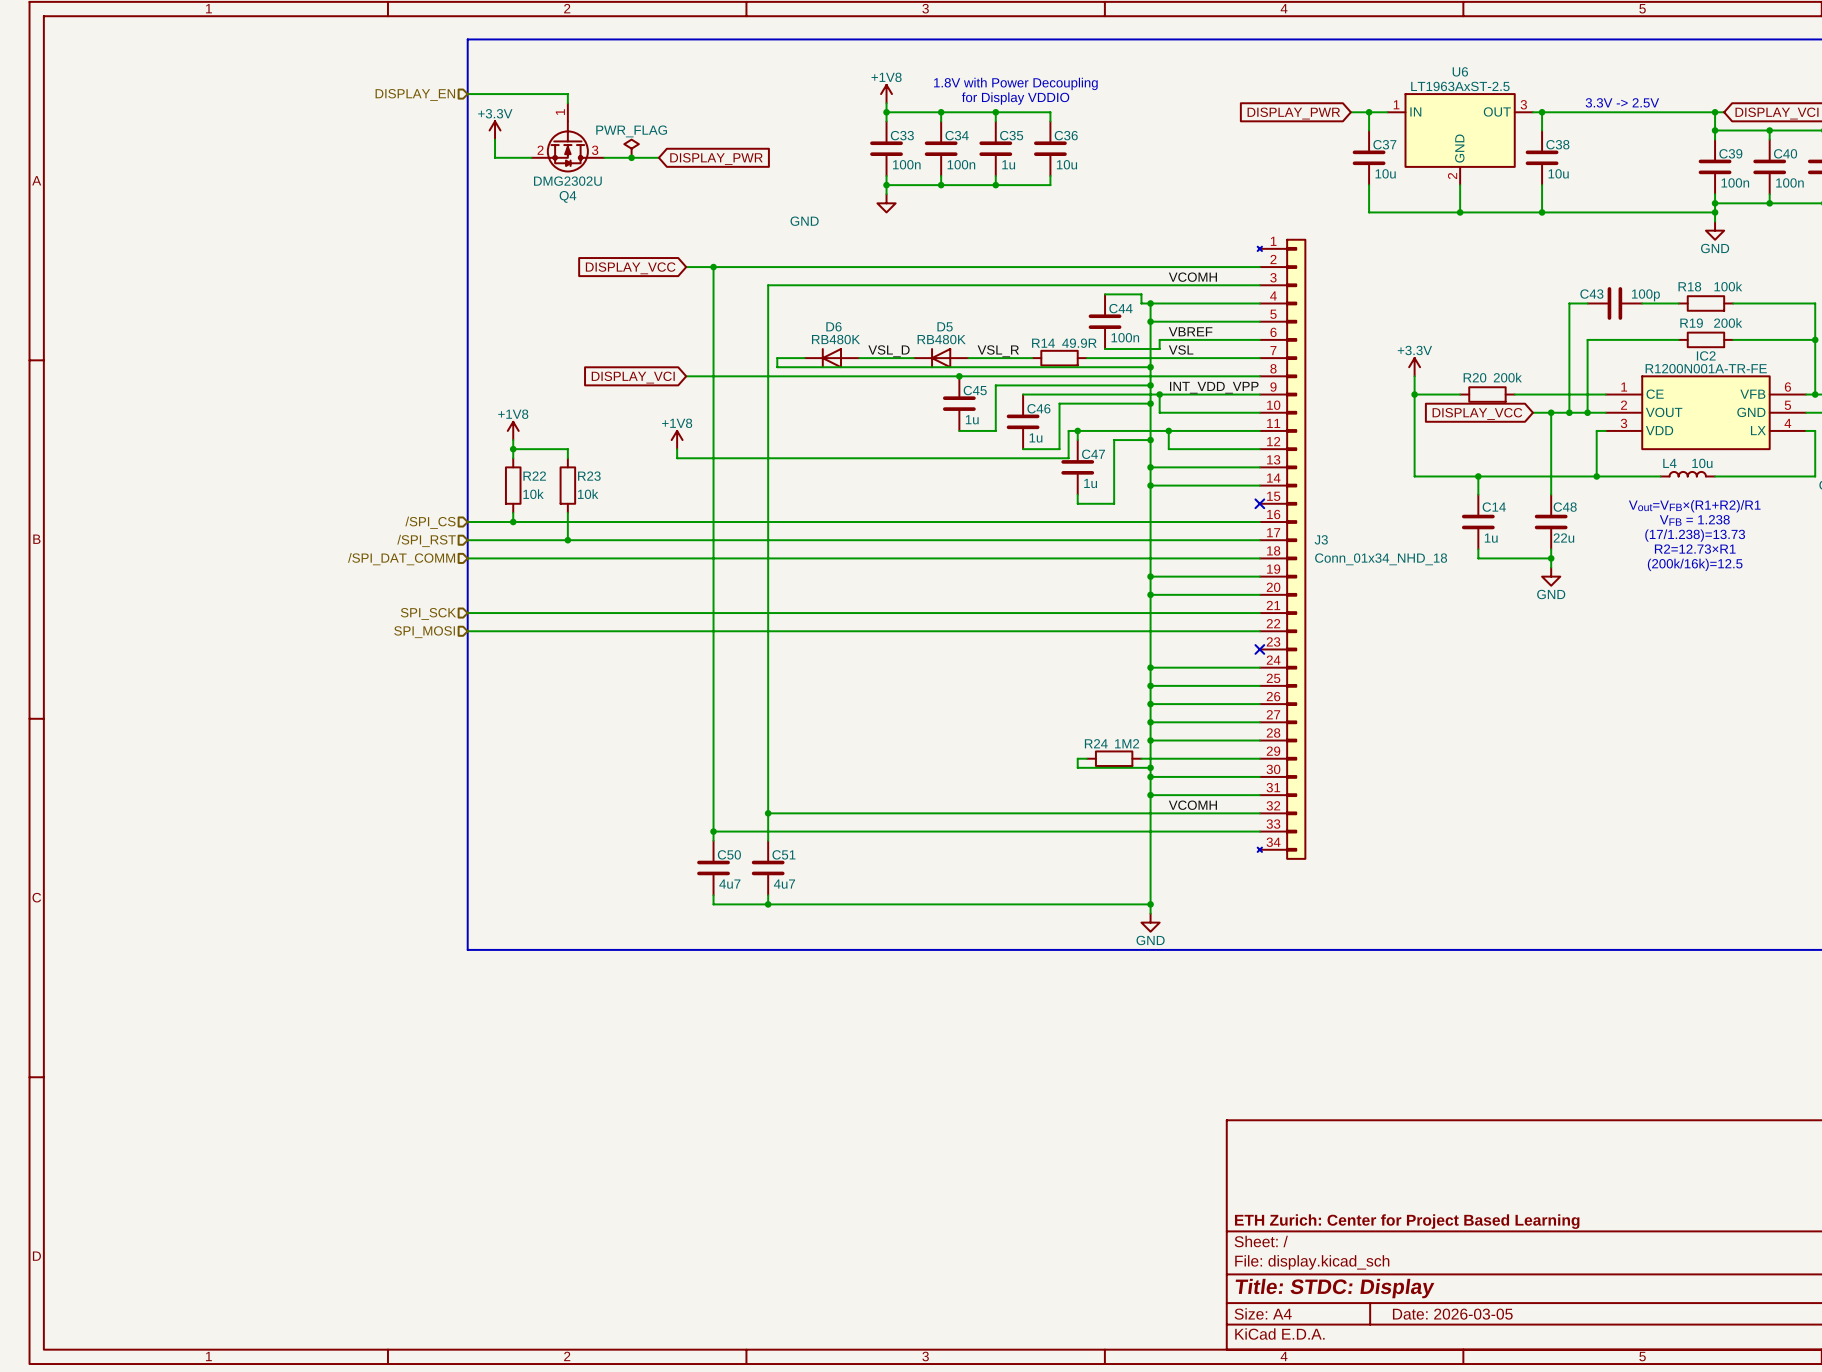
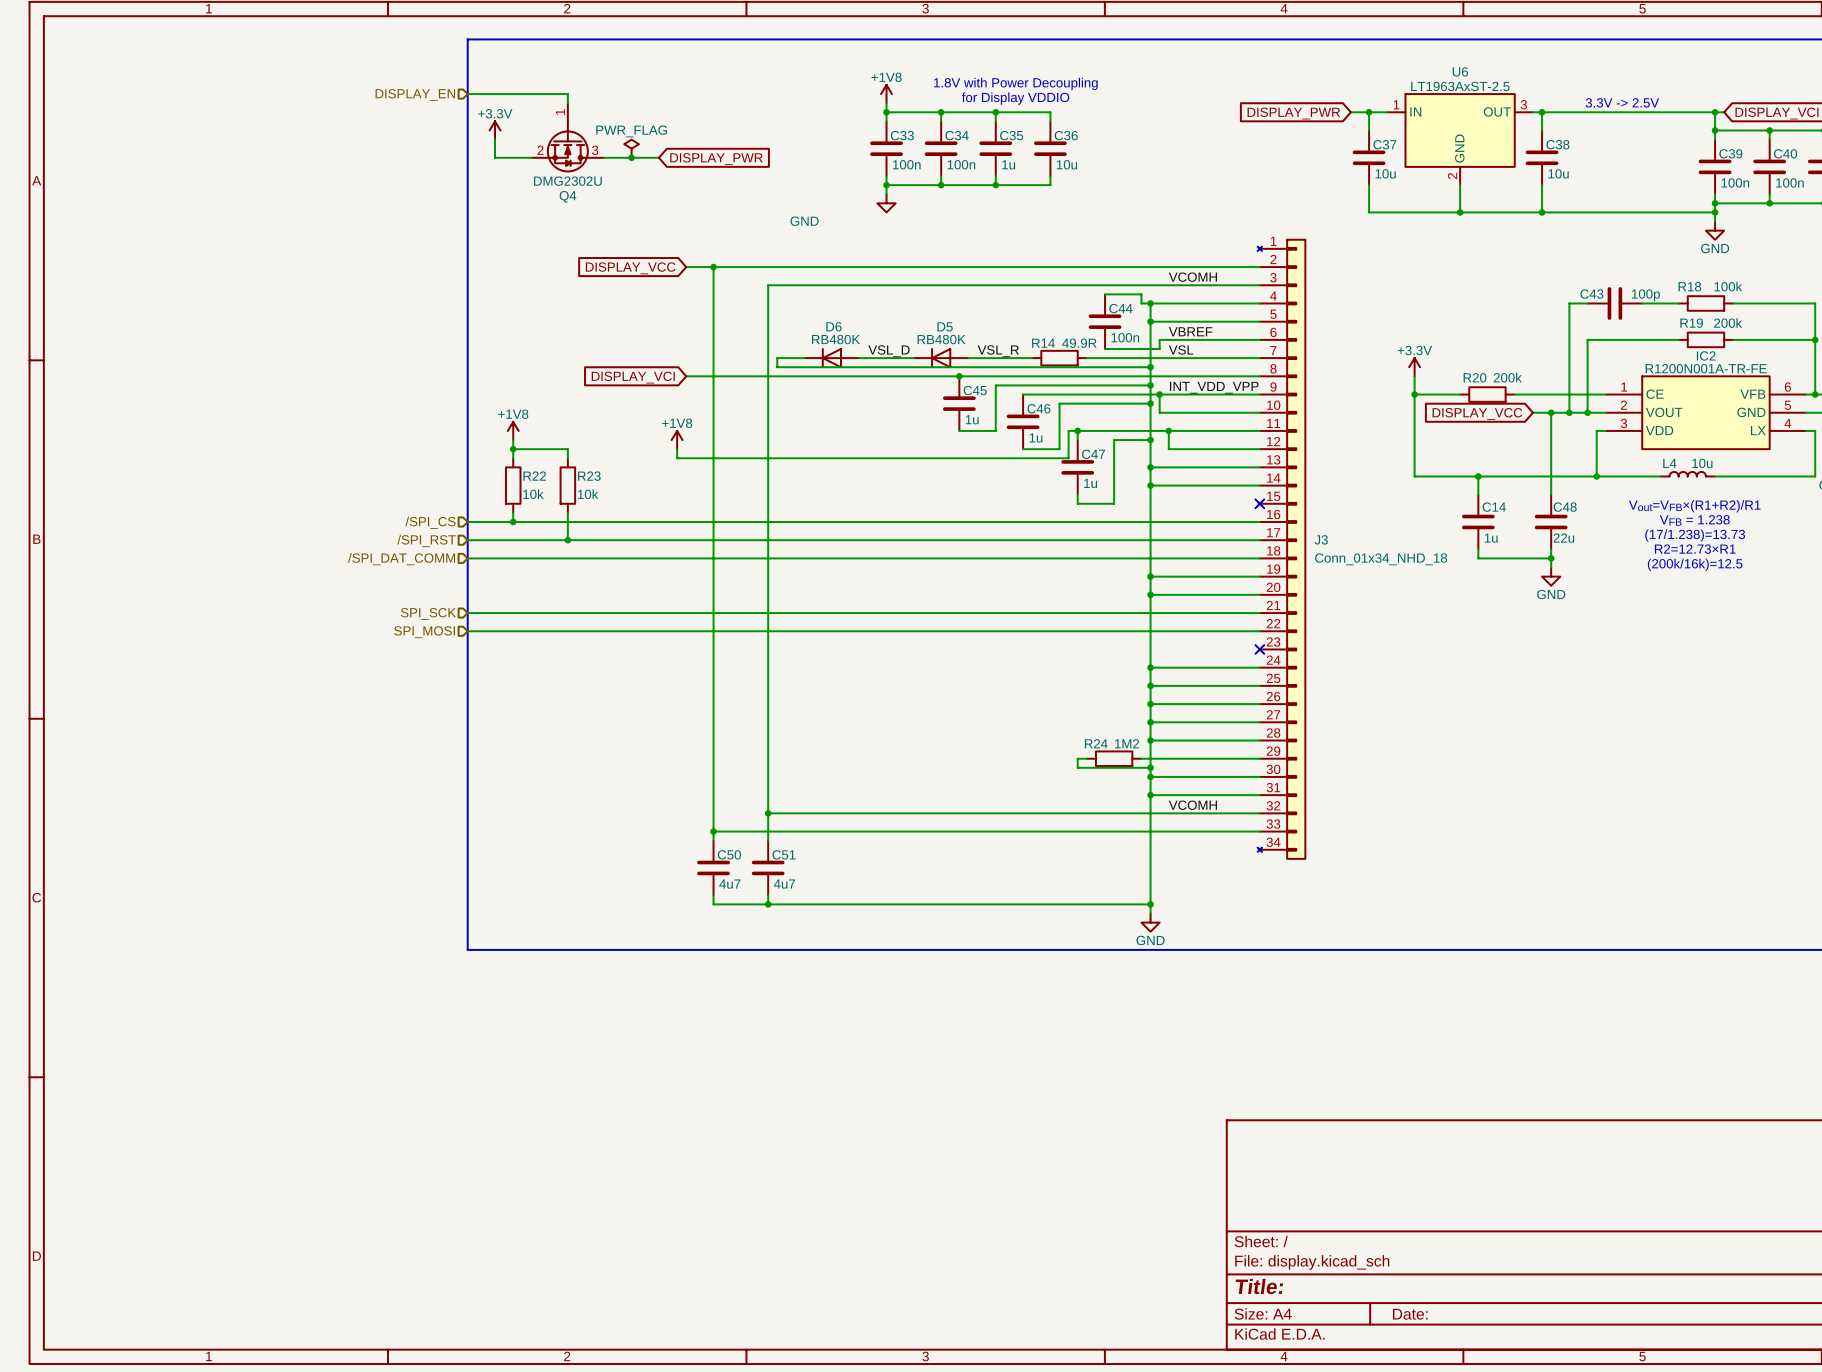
title block: ETH Zurich: Center for Project Based Learning (1407, 1221) -> none
title block: Title: STDC: Display (1335, 1288) -> Title: (1259, 1286)
title block: Date: 2026-03-05 (1452, 1314) -> Date: (1410, 1314)

